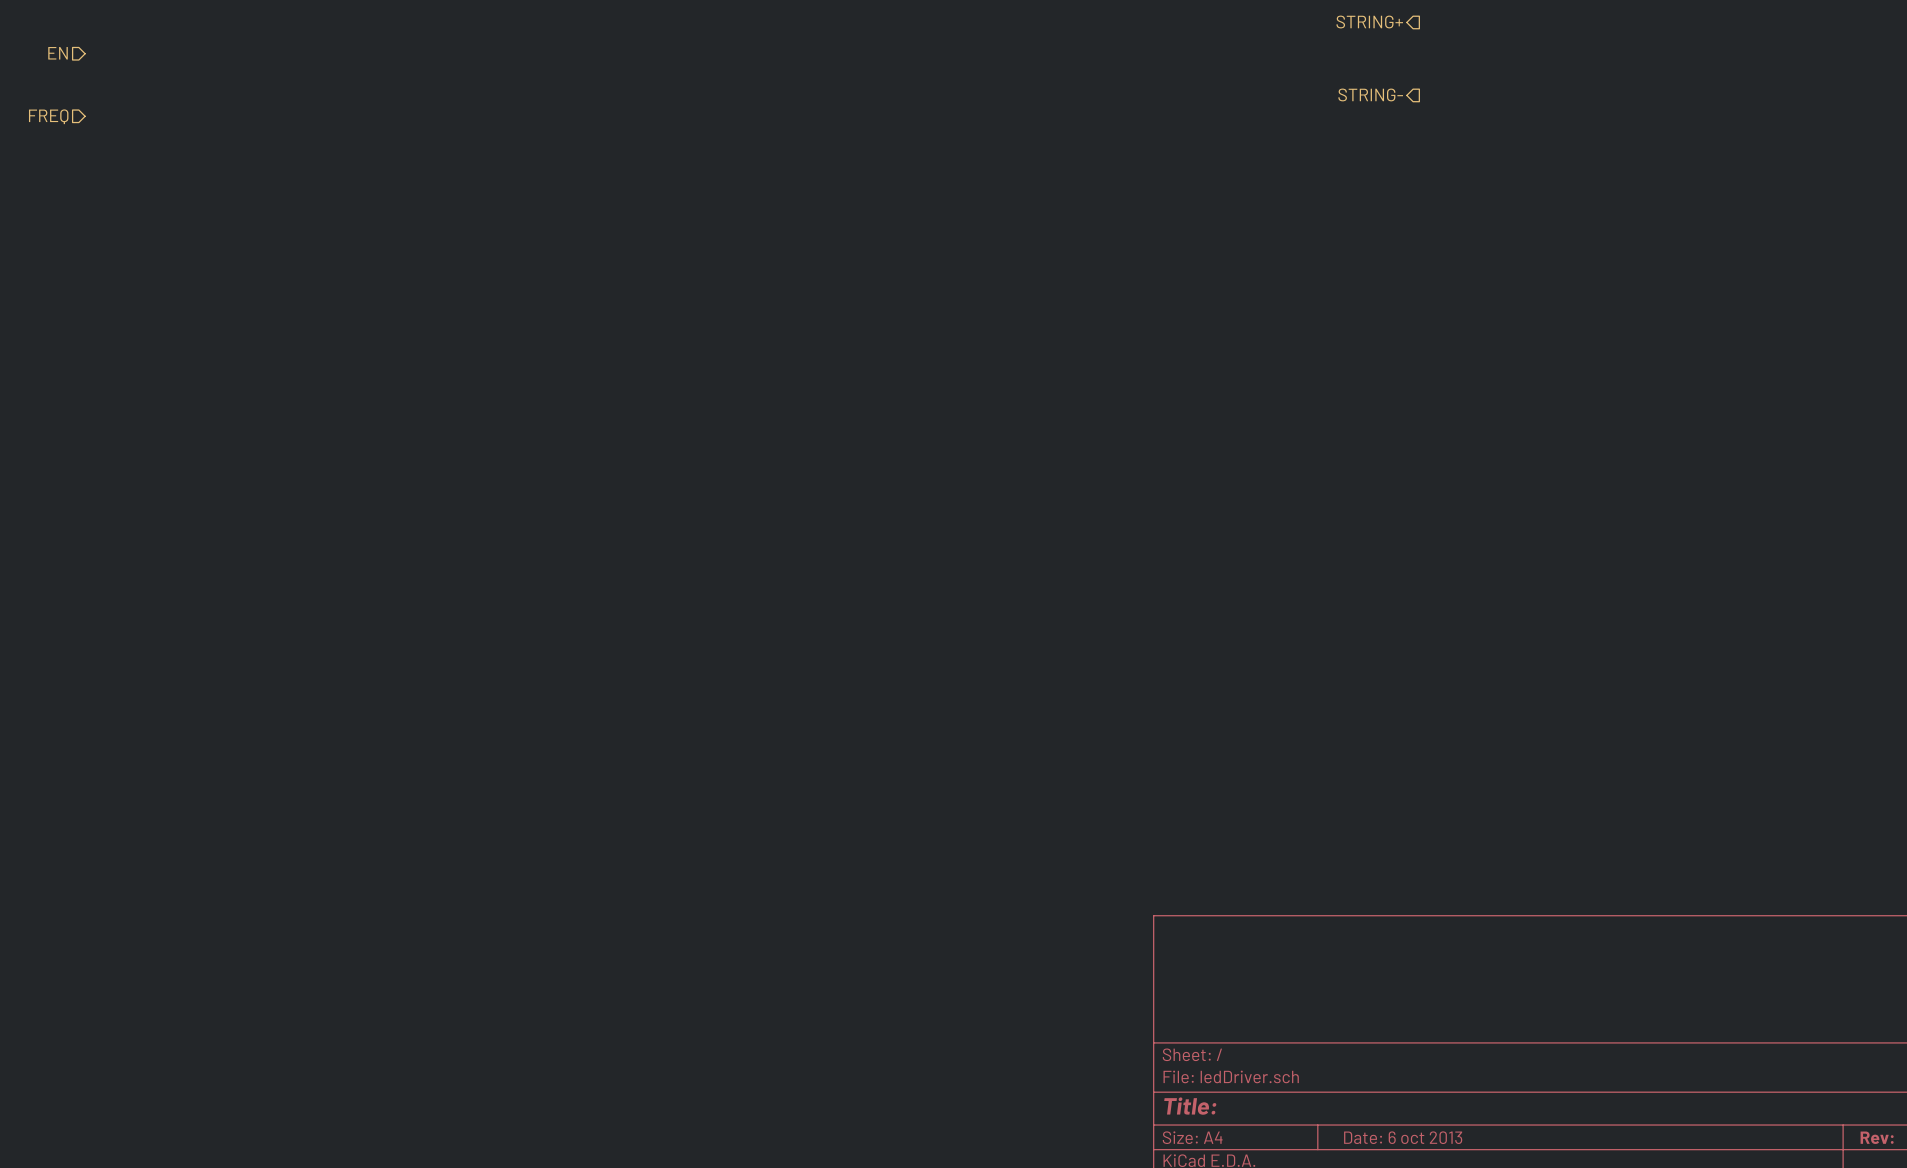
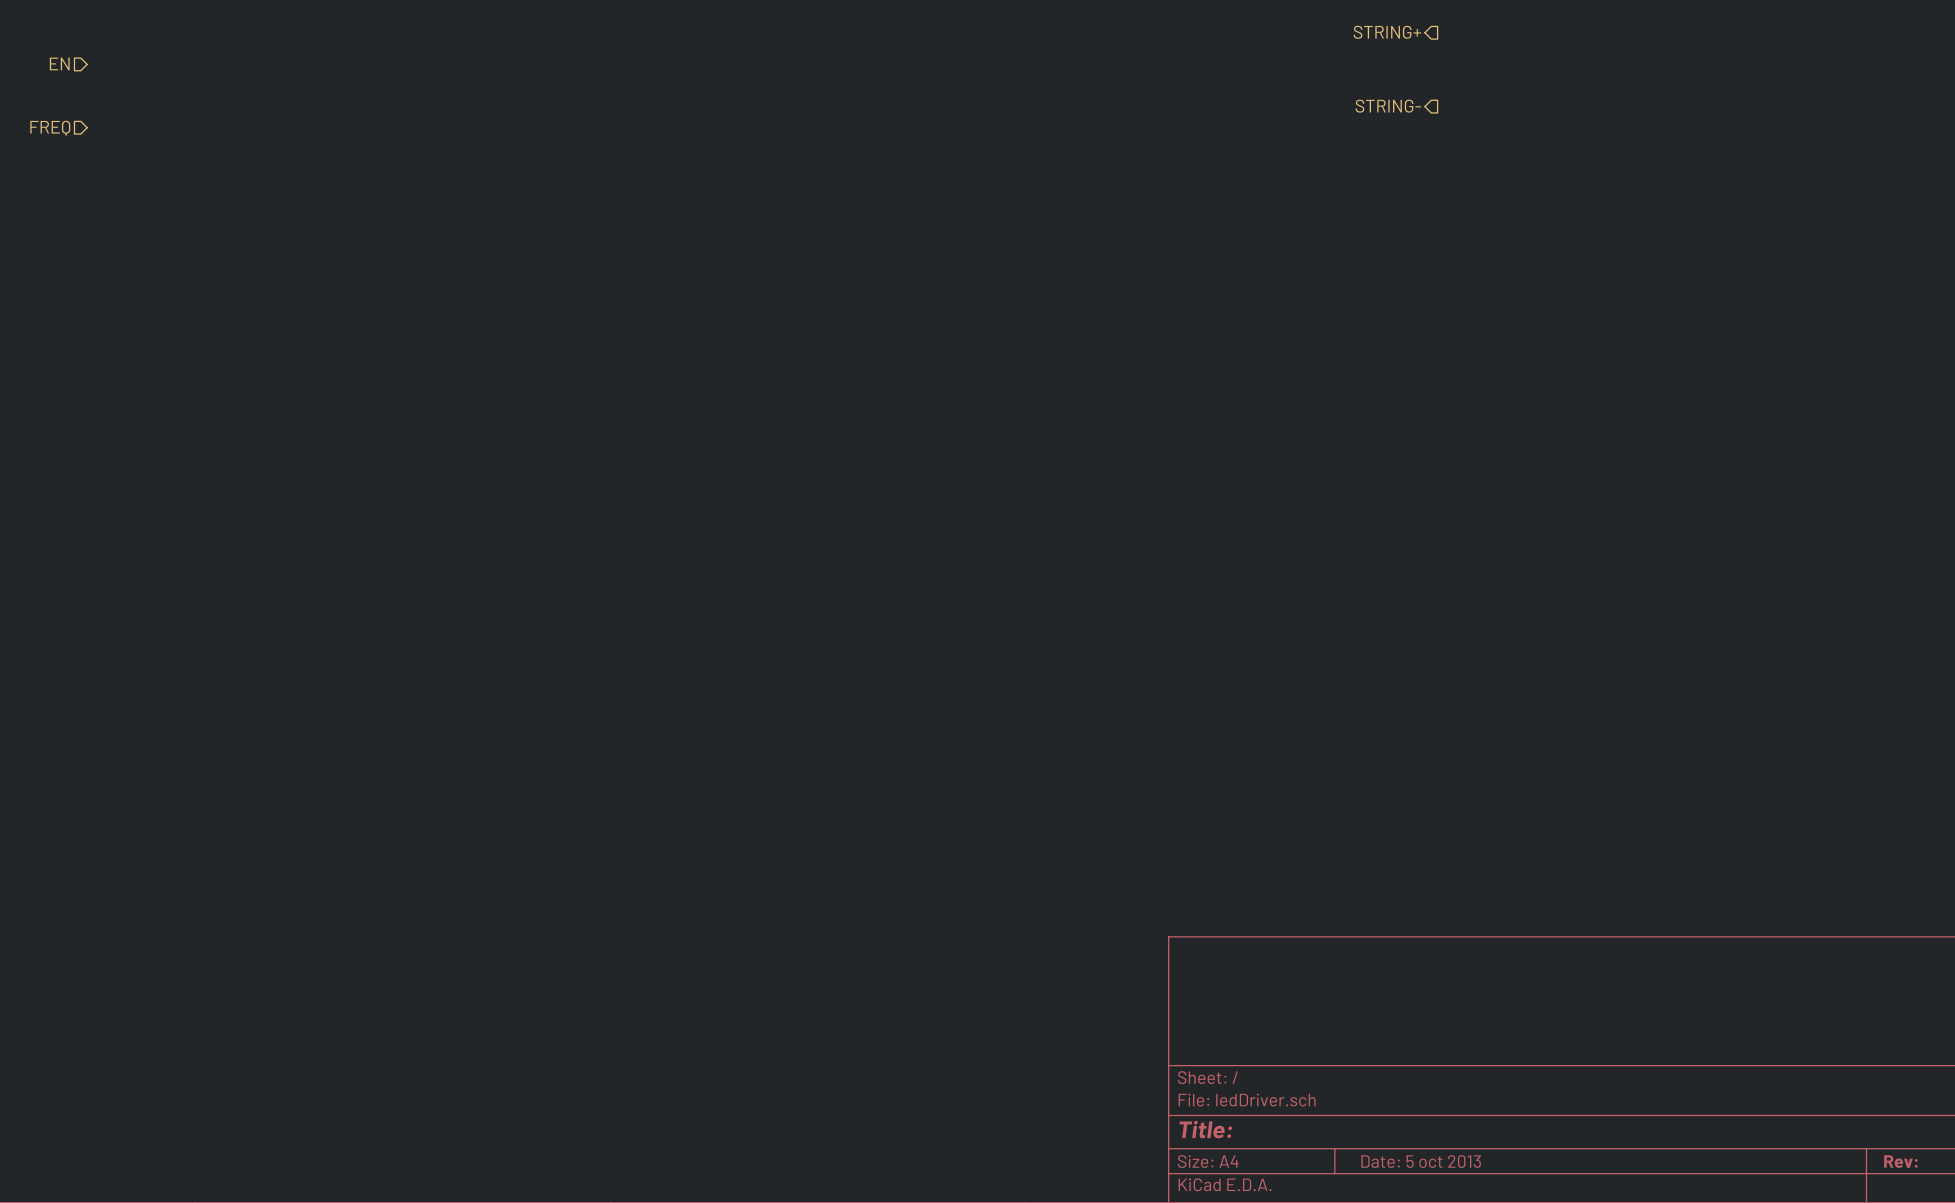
title block: Date: 6 oct 2013 (1403, 1137) -> Date: 5 oct 2013 (1421, 1161)

